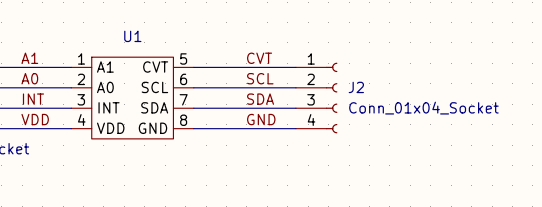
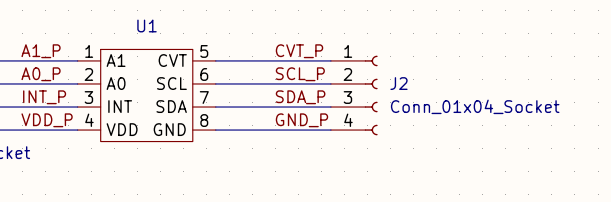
label: A1 (29, 58) -> A1_P (41, 51)
label: CVT (259, 58) -> CVT_P (299, 51)
label: A0 (29, 78) -> A0_P (41, 74)
label: SCL (260, 78) -> SCL_P (300, 74)
label: INT (33, 99) -> INT_P (44, 97)
label: SDA (260, 99) -> SDA_P (300, 97)
label: VDD (35, 119) -> VDD_P (47, 120)
label: GND (261, 119) -> GND_P (301, 120)

